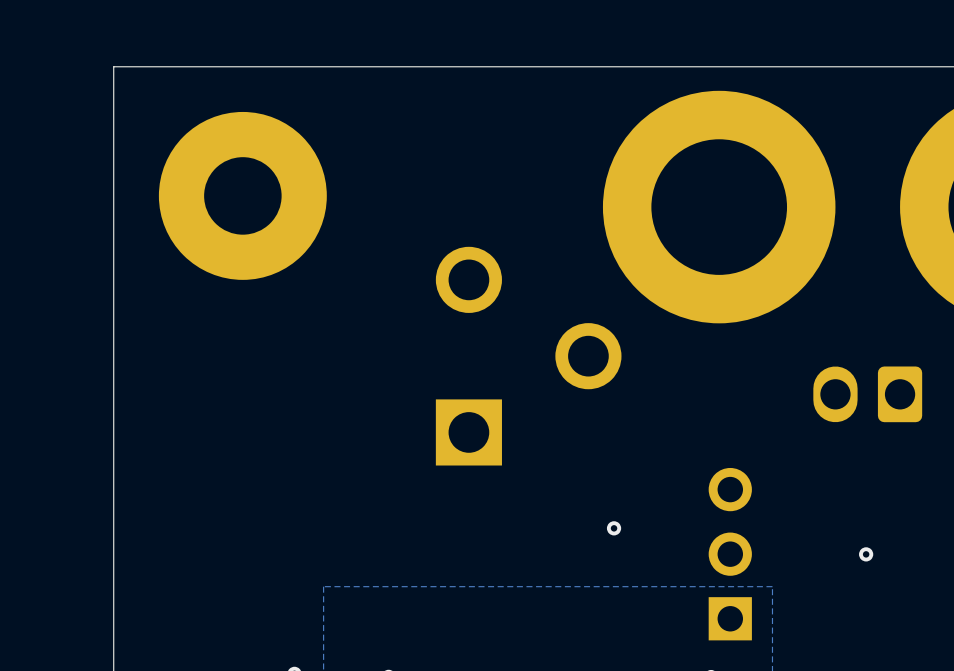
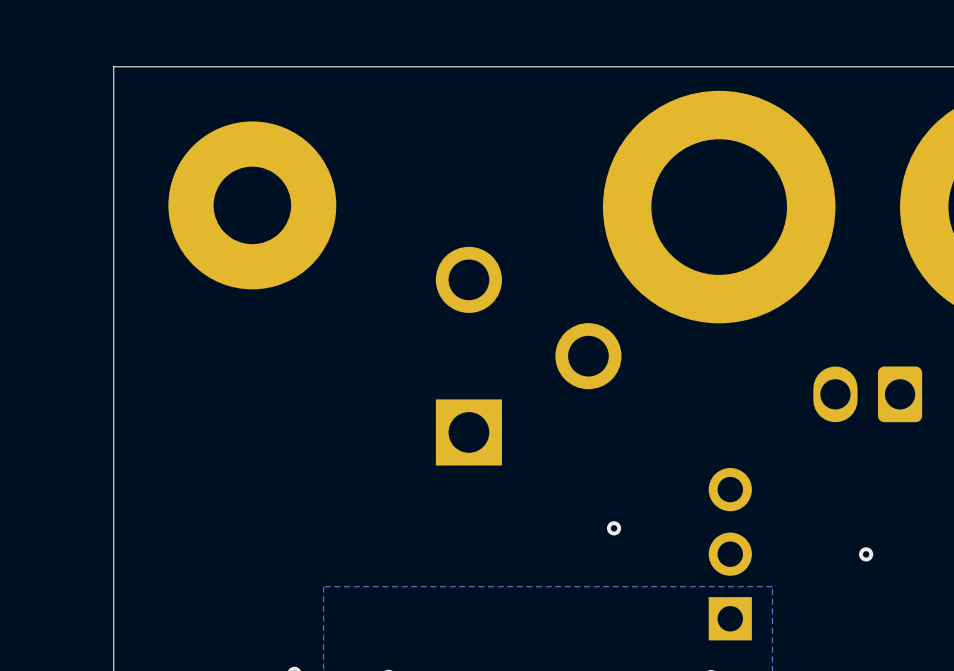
part position: (242, 195) -> (252, 205)

